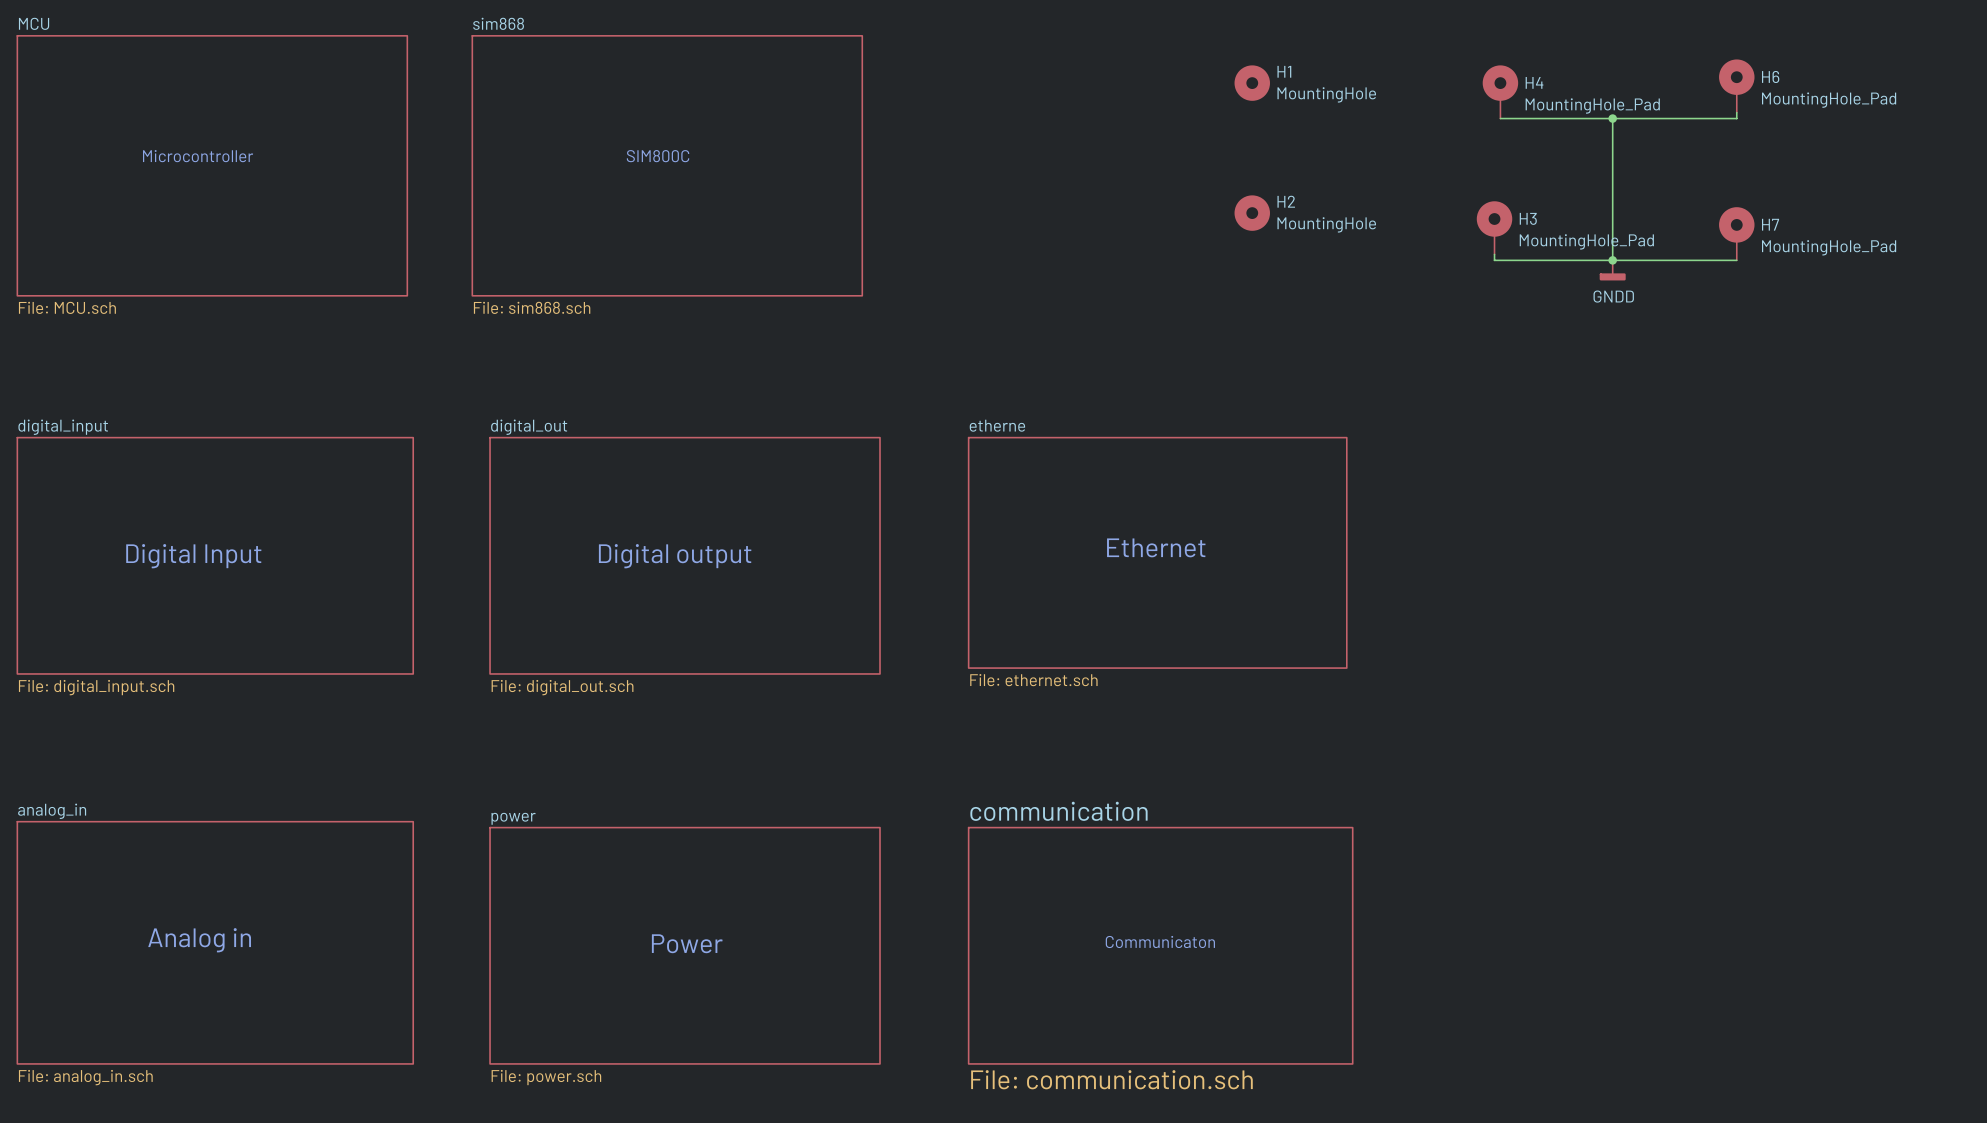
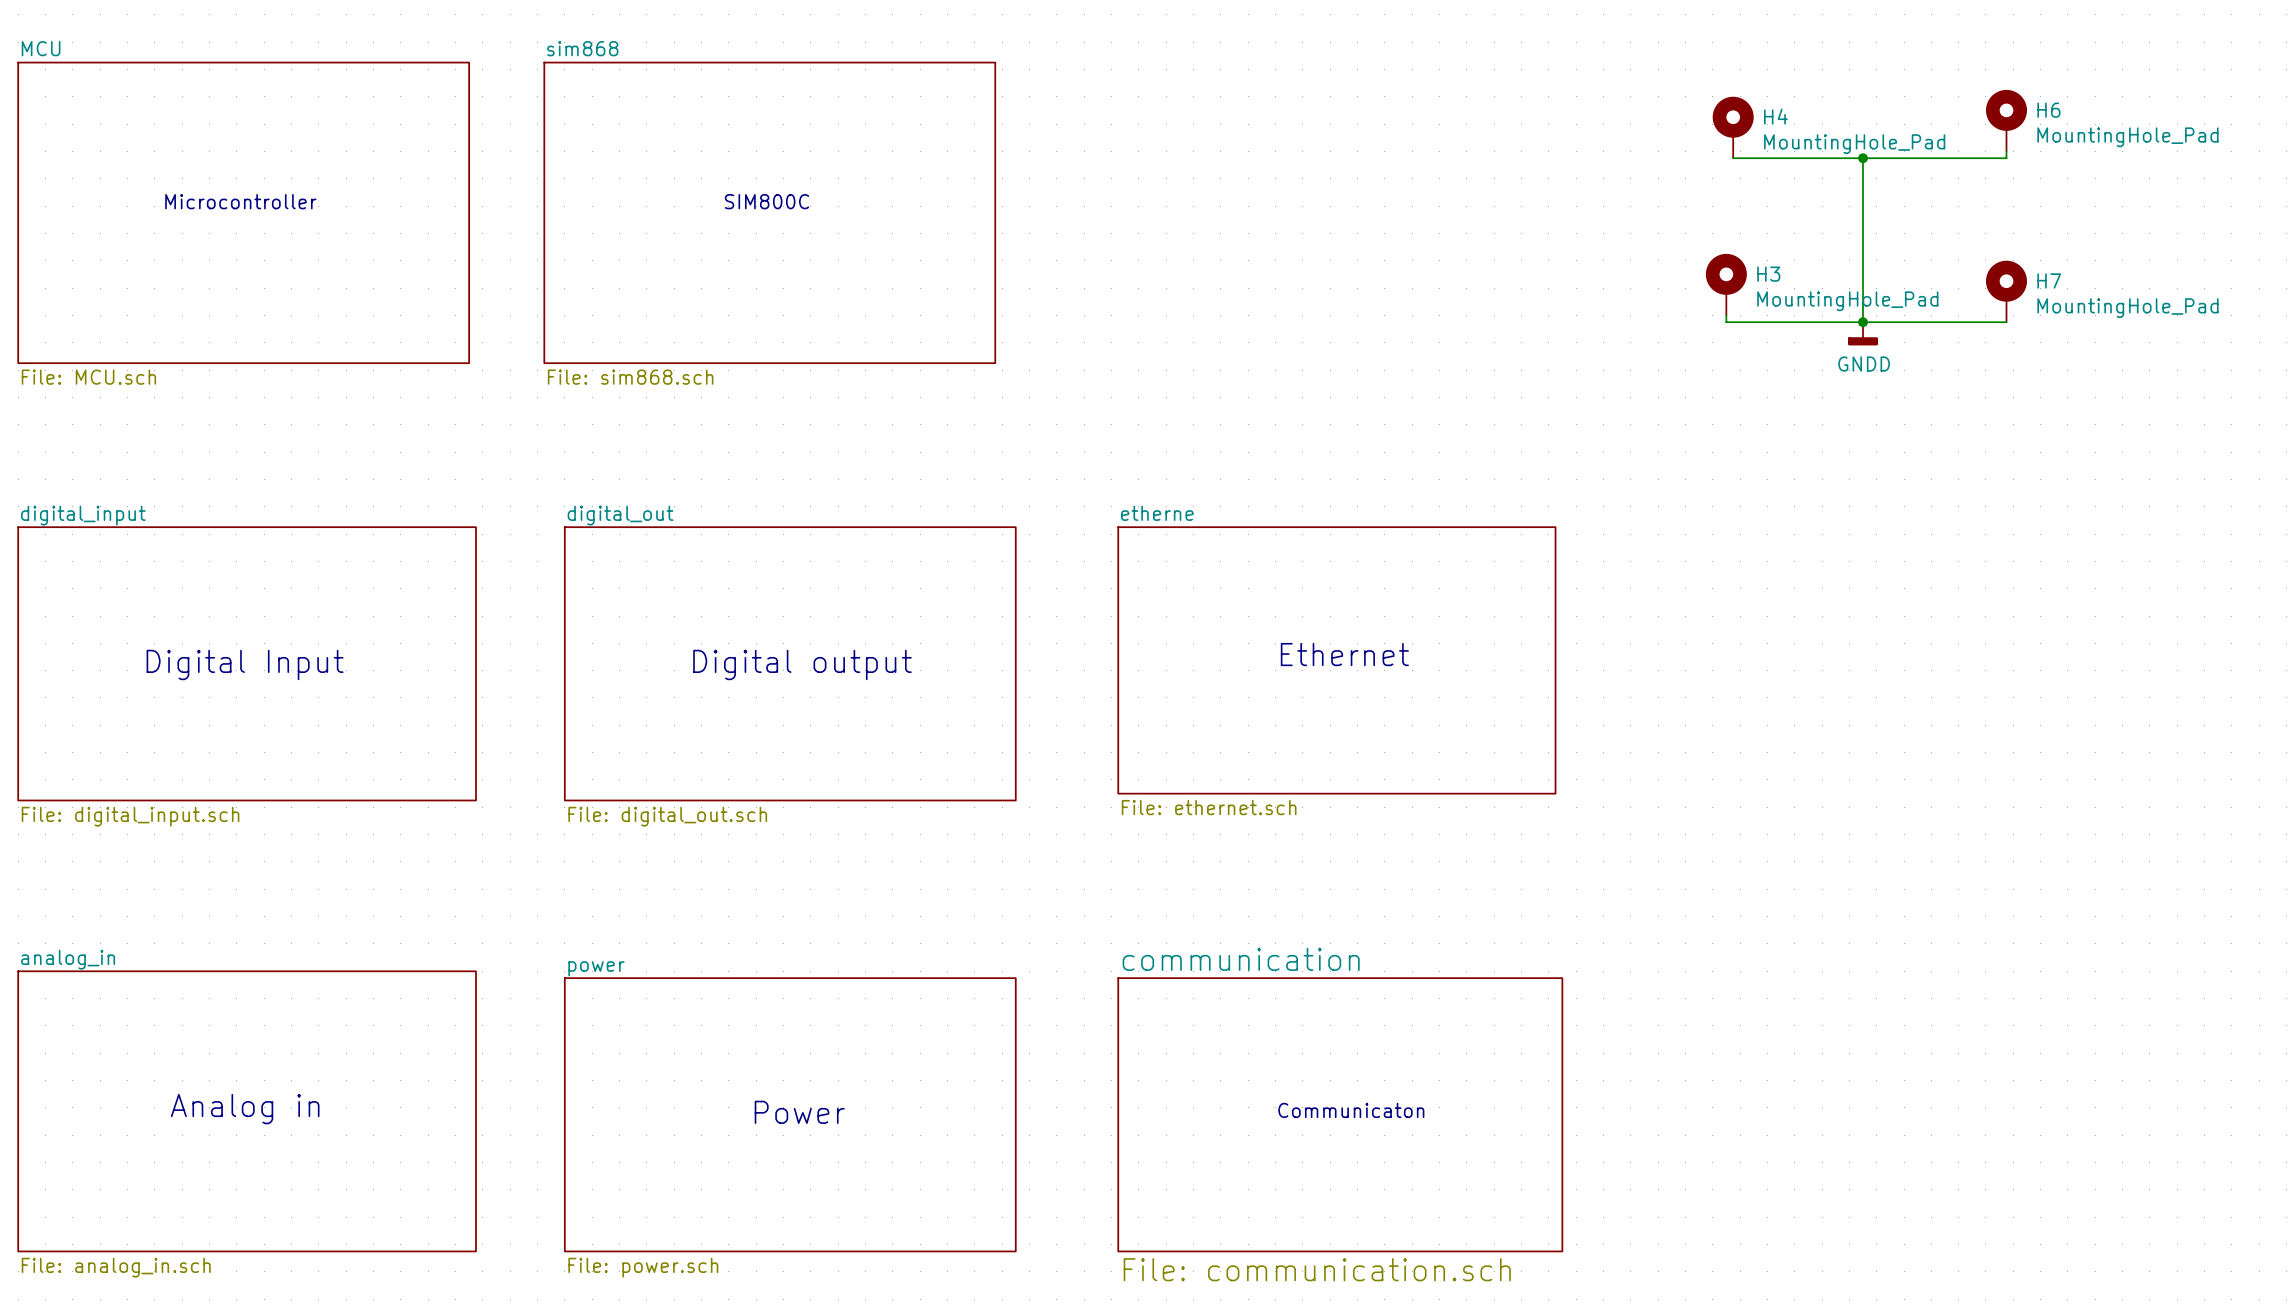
H1: MountingHole (1252, 83) -> none
H2: MountingHole (1252, 213) -> none

